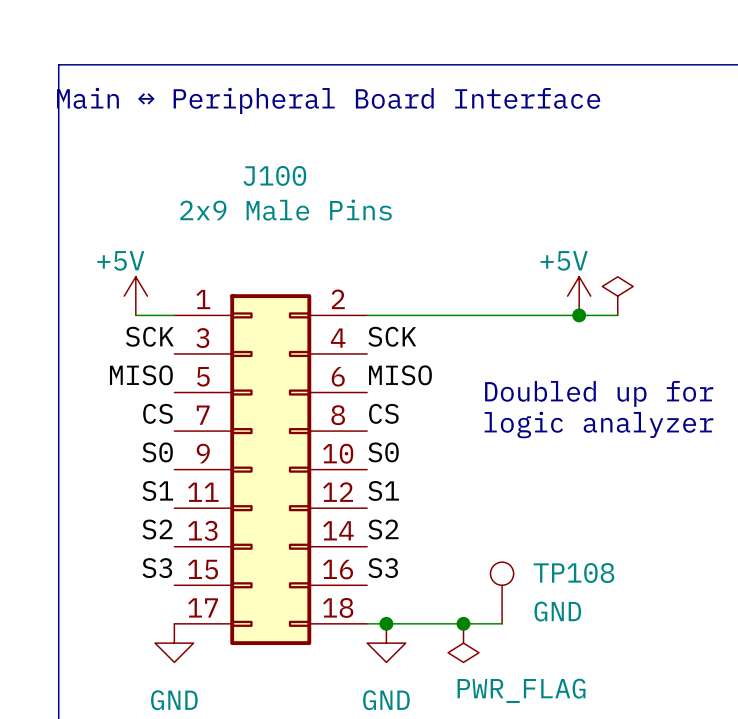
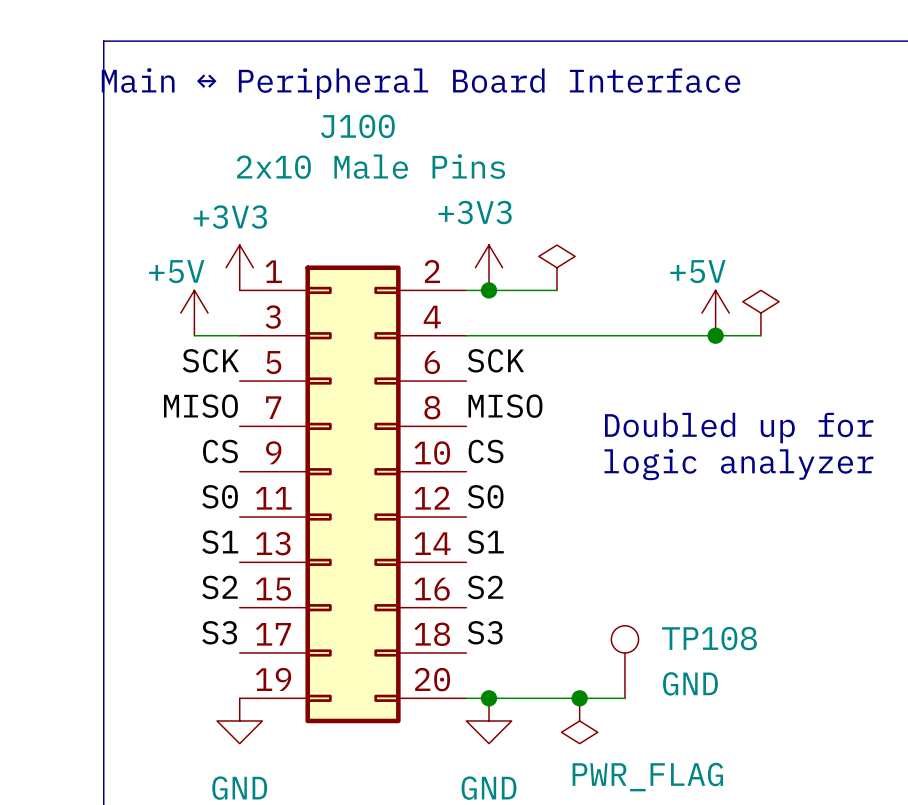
J100 value: 2x9 Male Pins (286, 210) -> 2x10 Male Pins (370, 166)
power symbol: none -> +3V3 (239, 267)
power symbol: none -> +3V3 (489, 267)
power symbol: none -> (556, 267)
wire: none -> (466, 290) (556, 290)
junction: none -> (489, 290)
J100 symbol: [174, 294, 368, 646] -> [239, 265, 467, 724]

